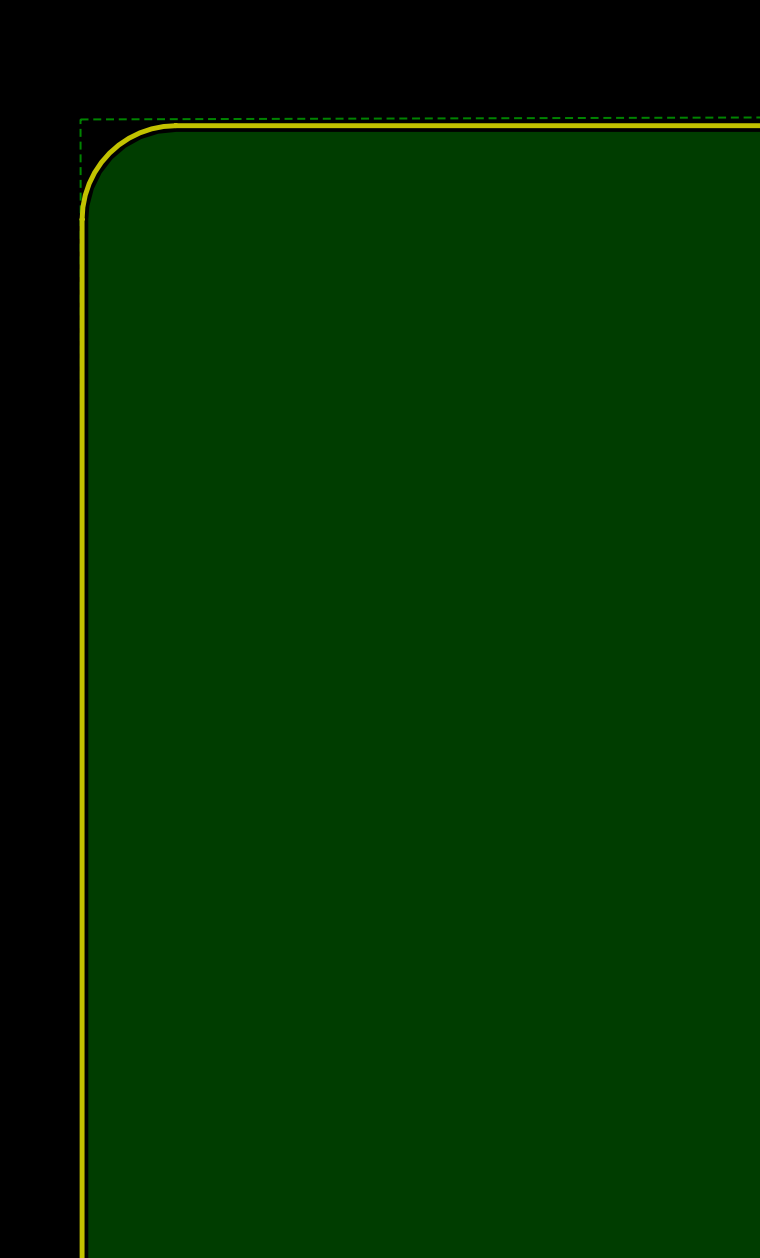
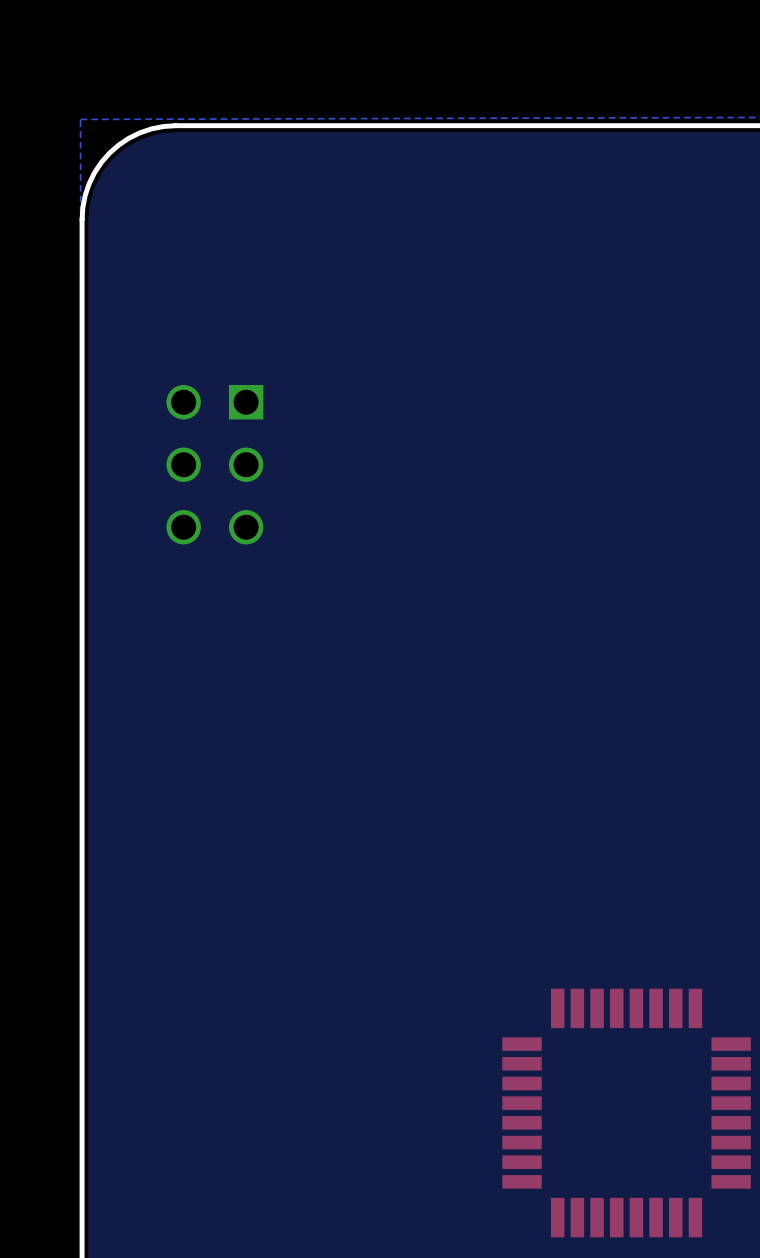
part: none -> (214, 464)
part: none -> (626, 1112)

